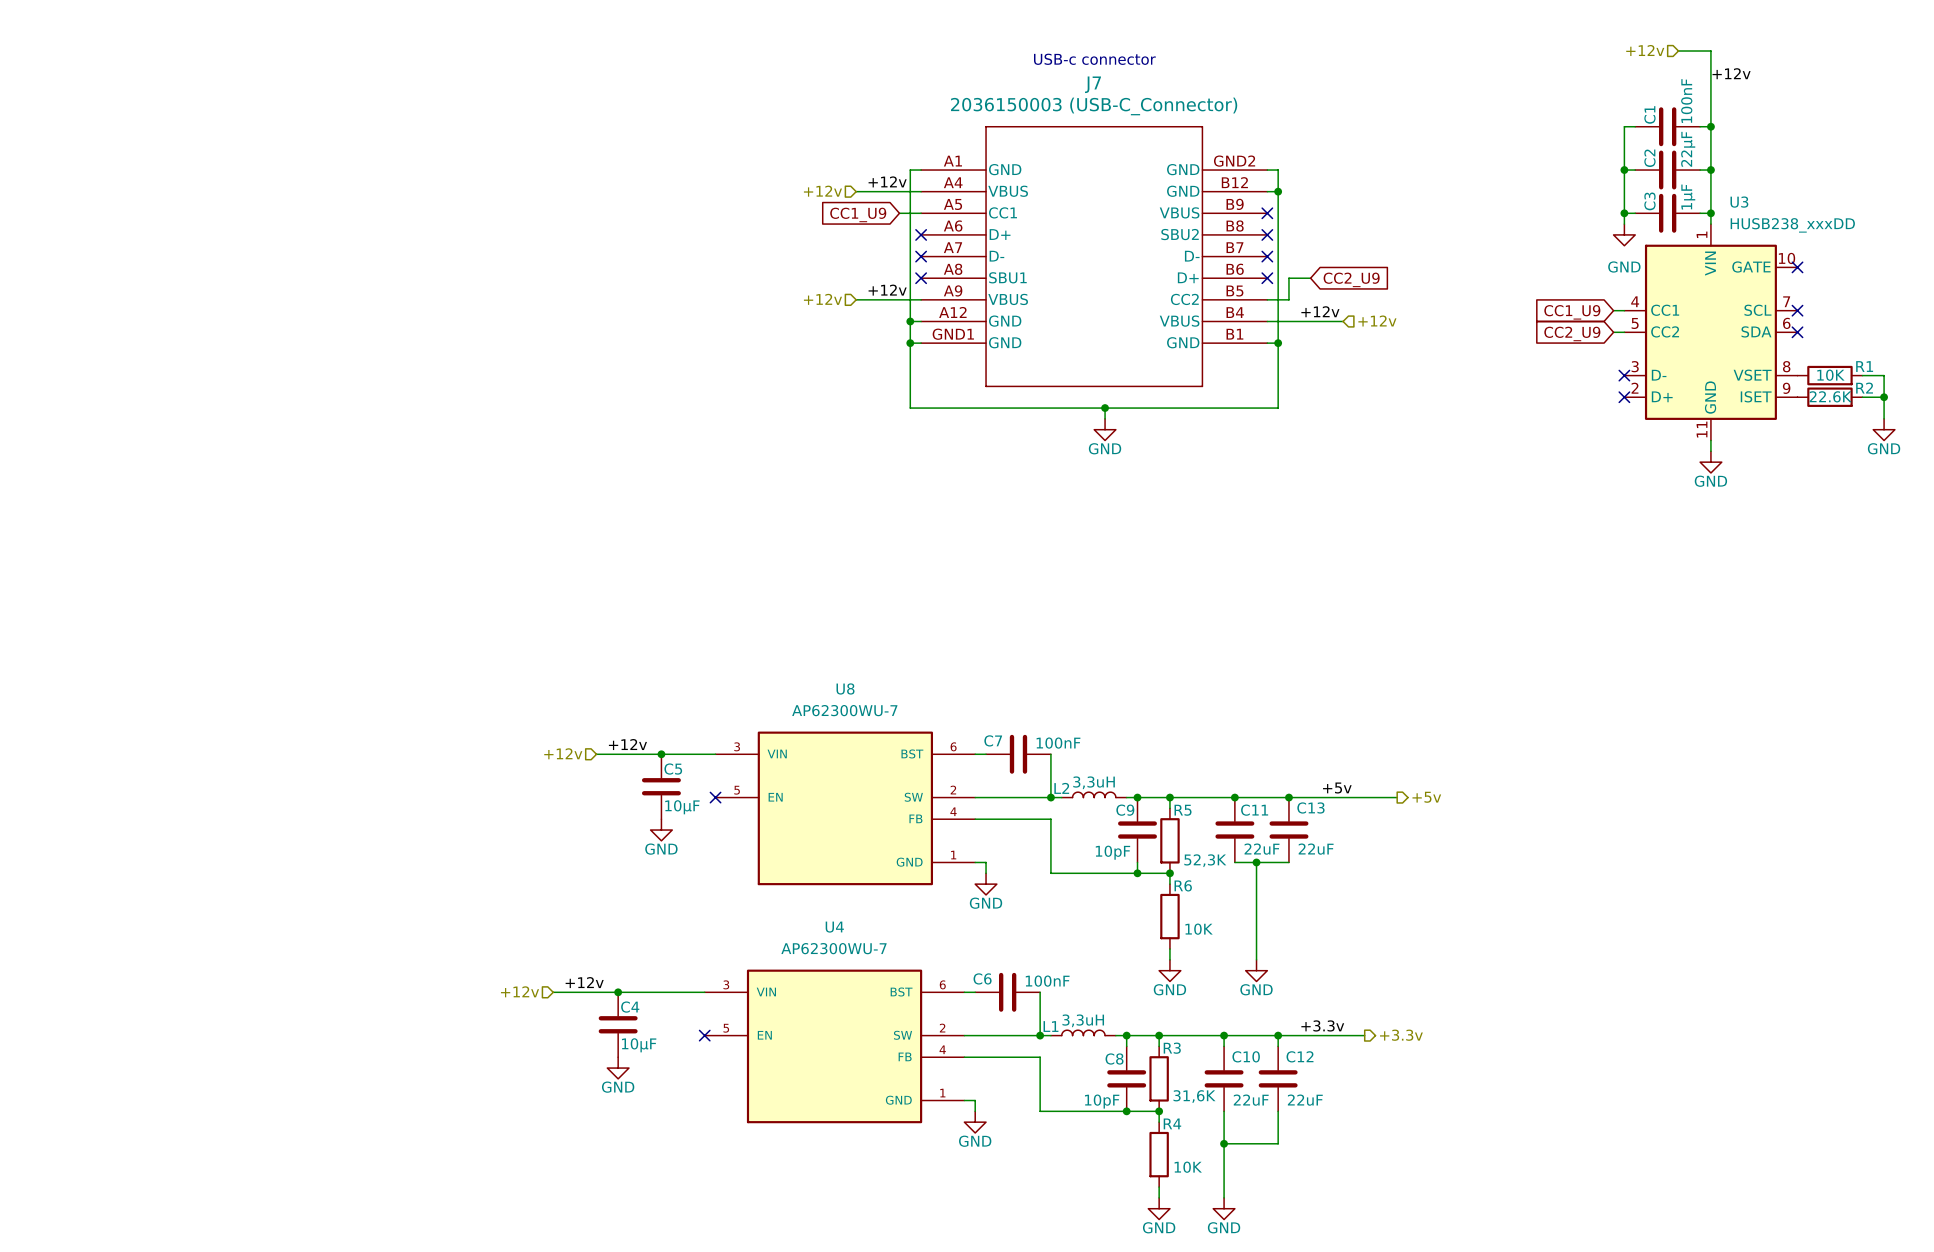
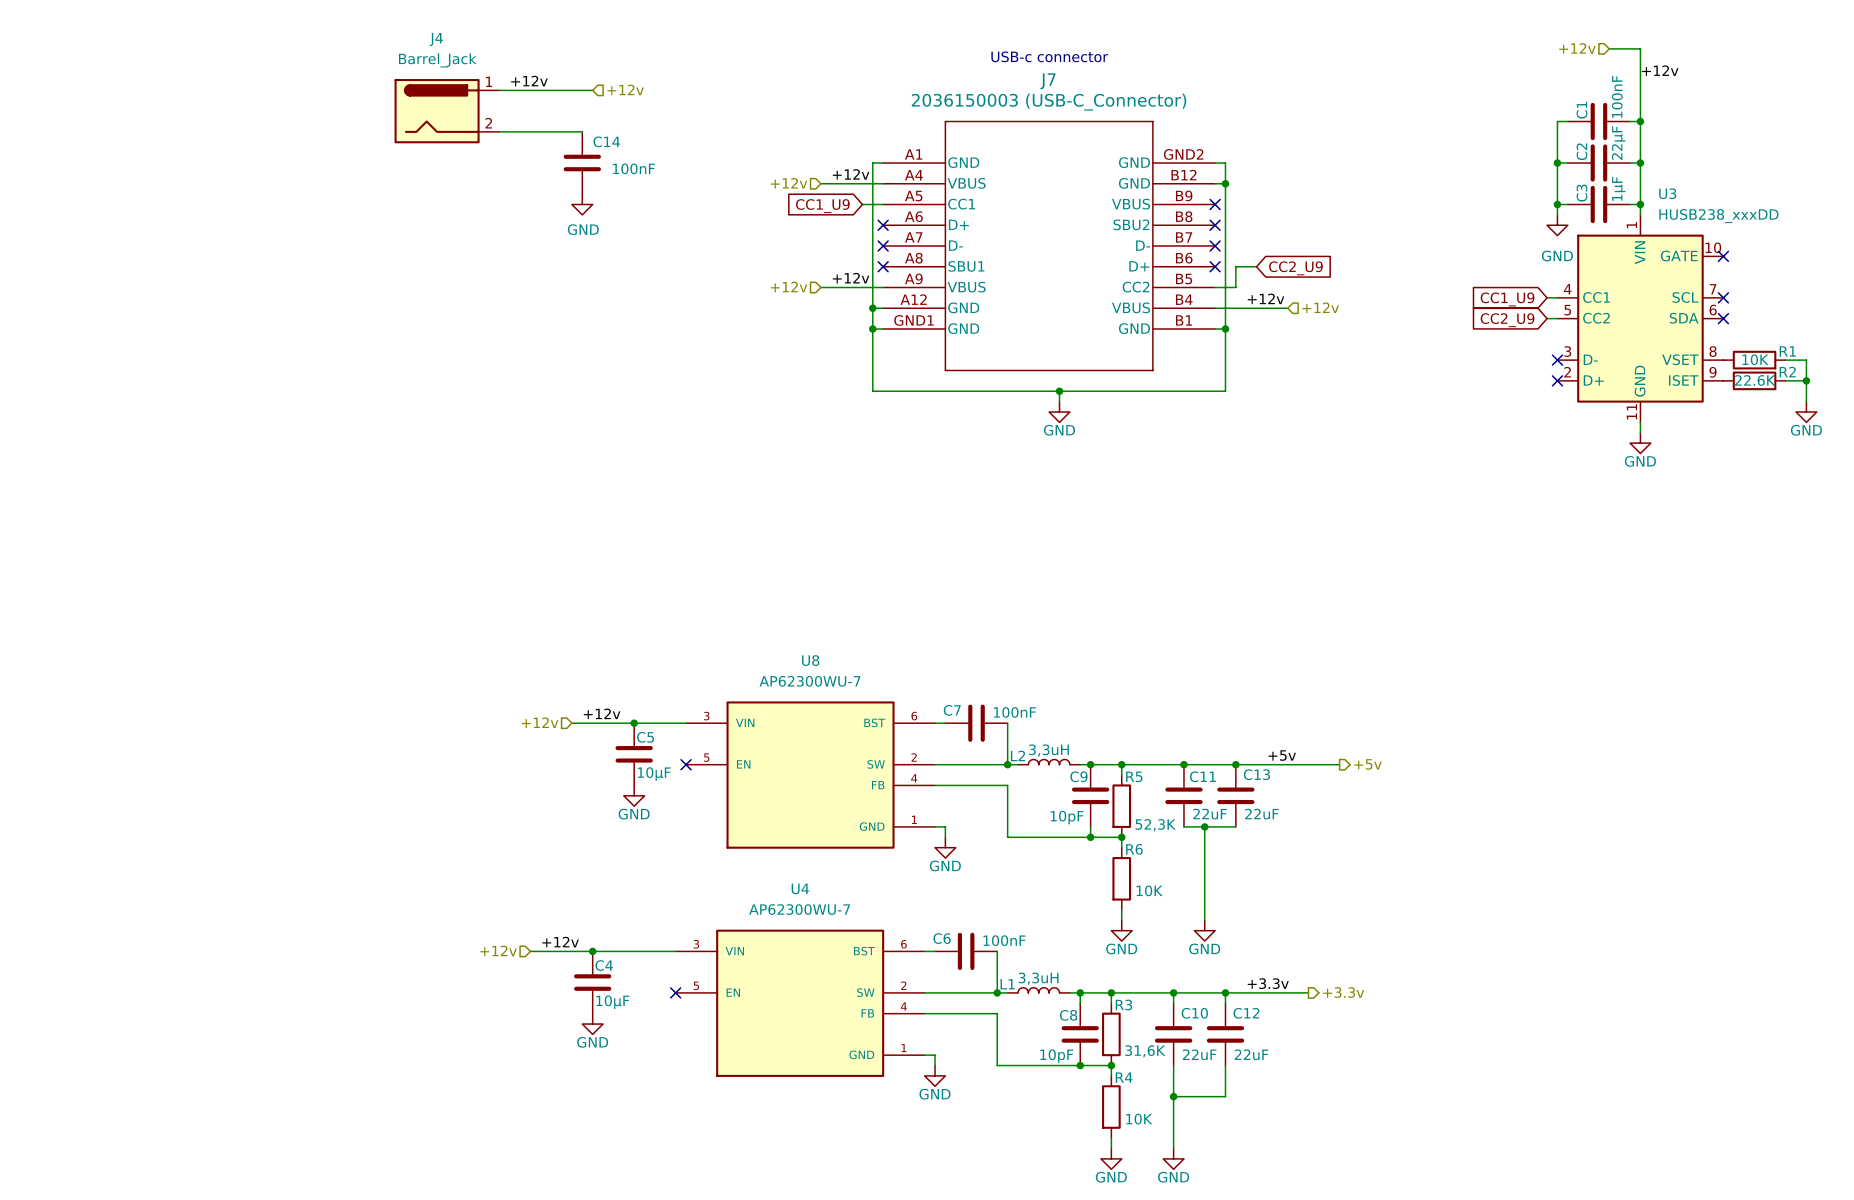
label: none -> +12v (529, 81)
hierarchical label: none -> +12v (625, 89)
wire: none -> (499, 90) (592, 90)
J4: none -> Barrel_Jack (446, 111)
wire: none -> (499, 131) (582, 131)
C14: none -> 100nF (582, 163)
power symbol: none -> GND (582, 204)

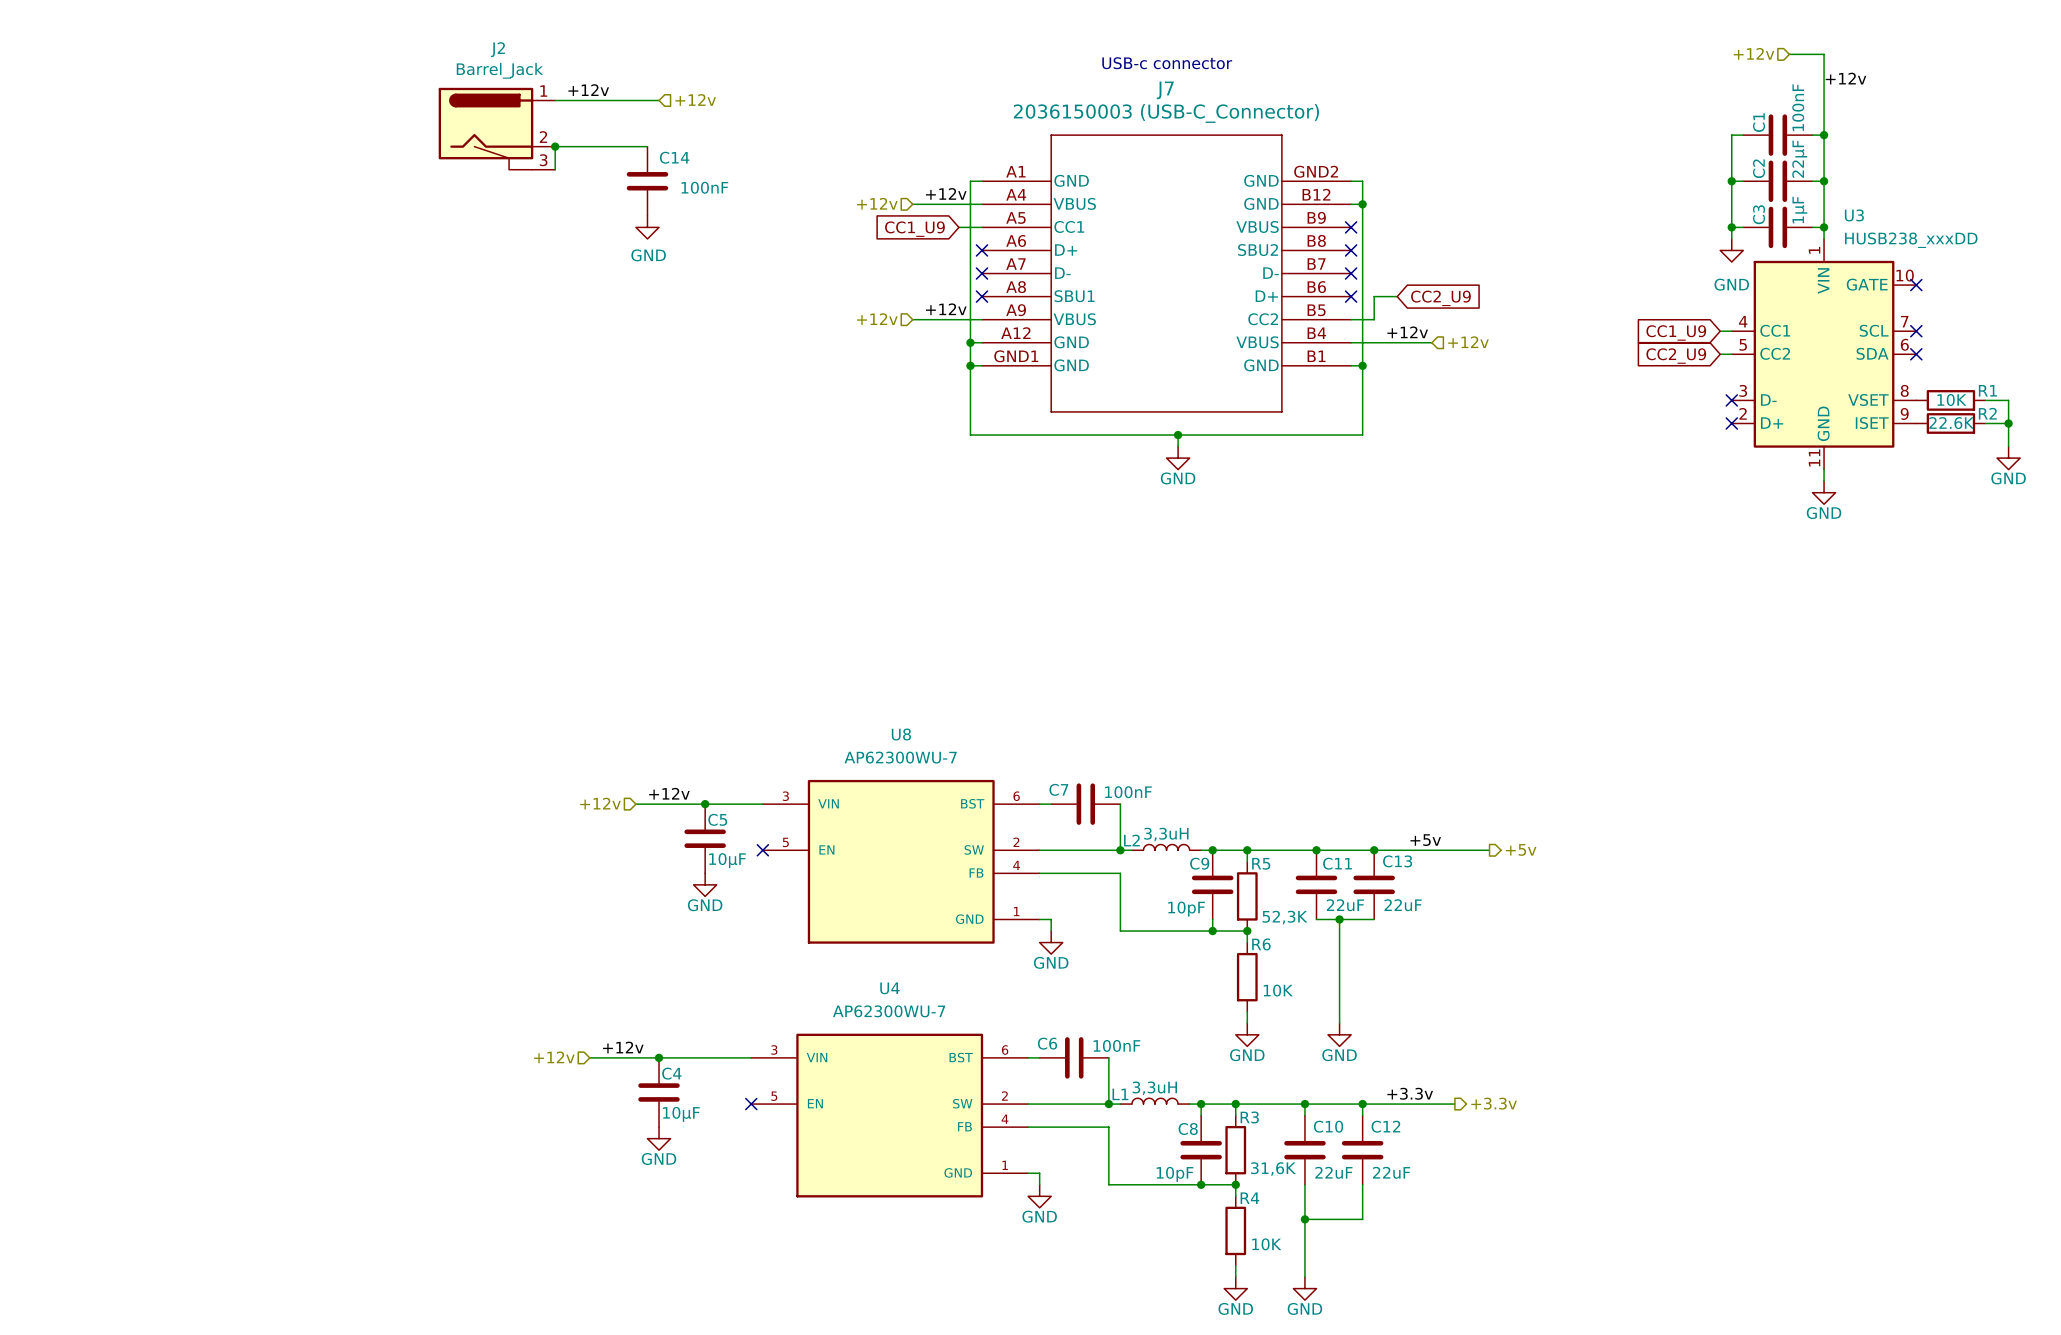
J4: Barrel_Jack (446, 111) -> none
J2: none -> Barrel_Jack (496, 128)
wire: none -> (555, 146) (555, 169)
junction: none -> (555, 146)

